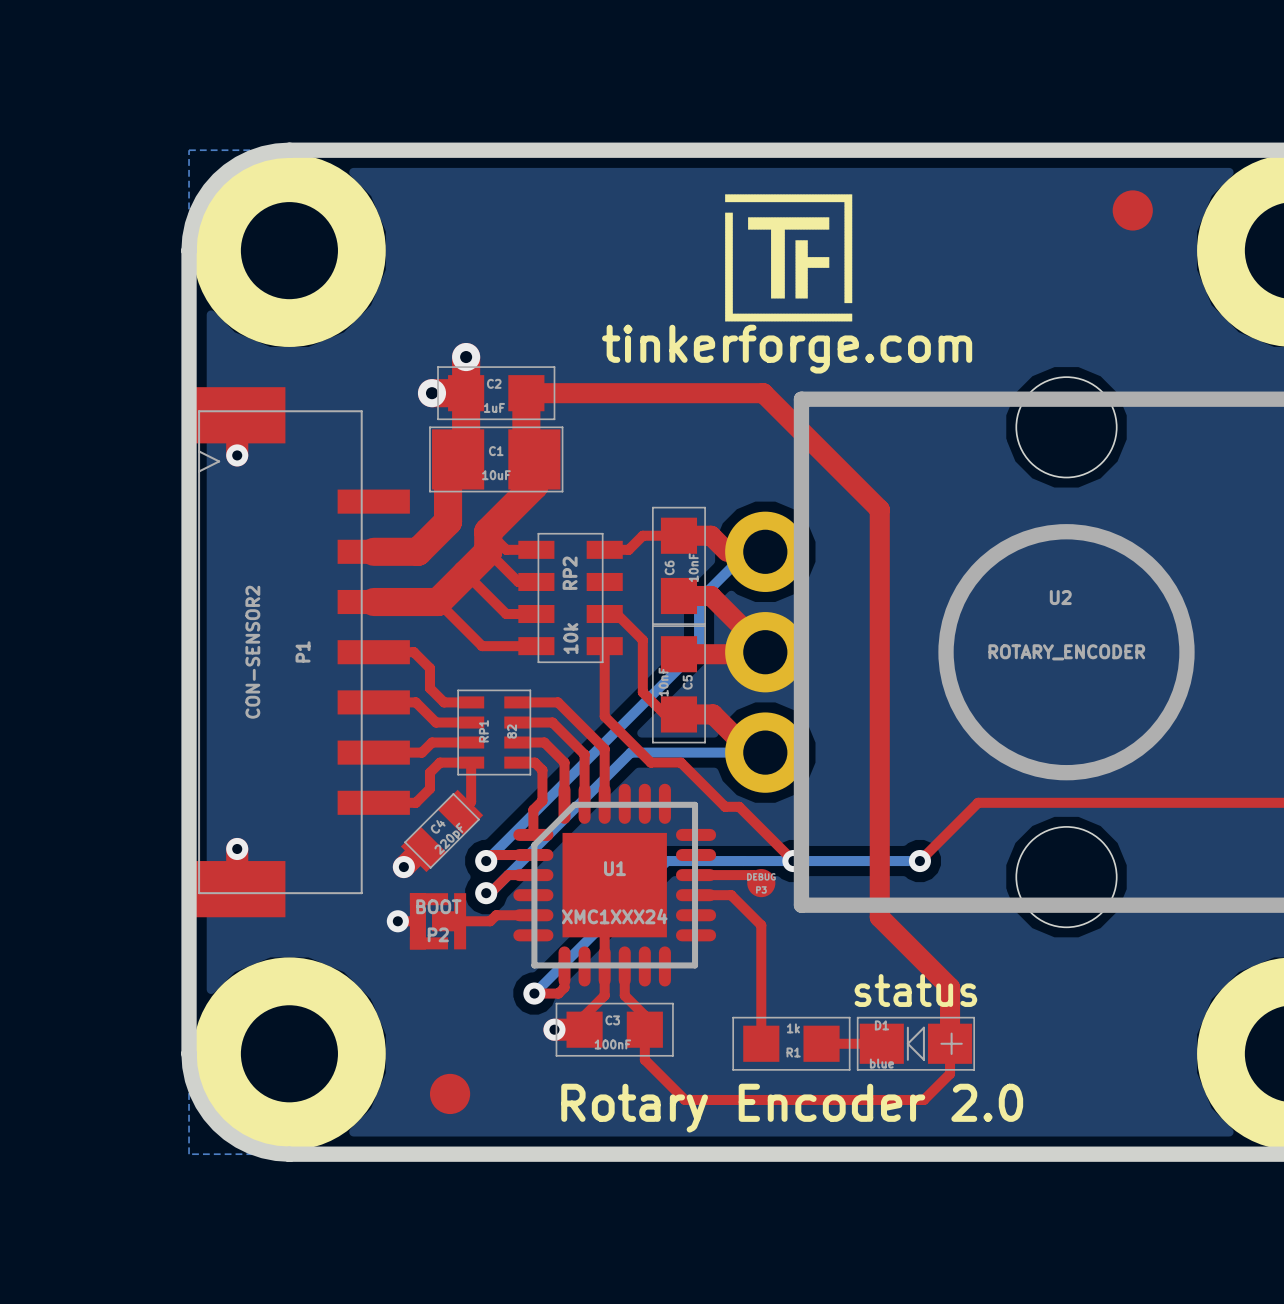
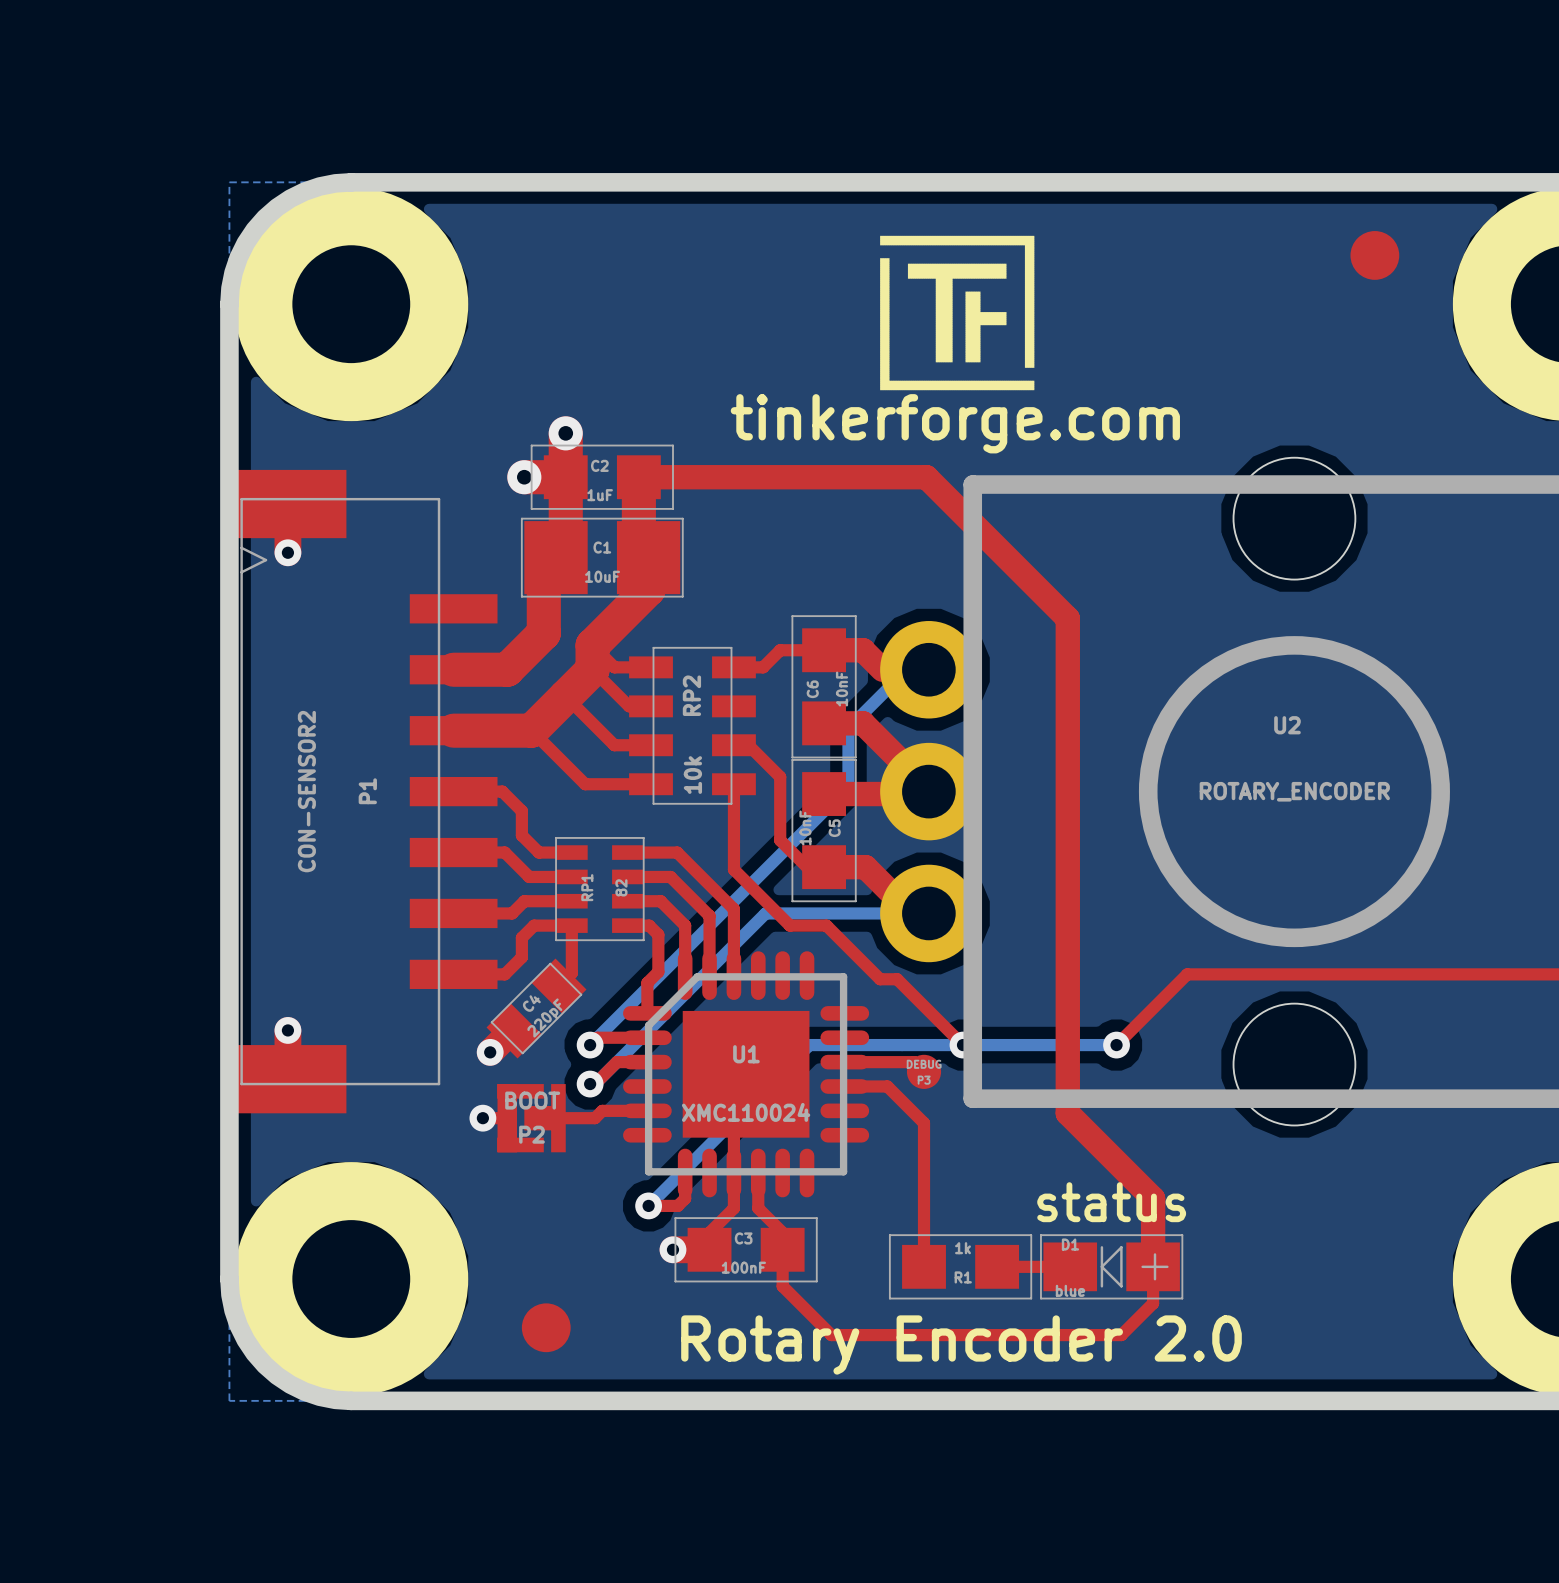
U1 value: XMC1XXX24 (614, 916) -> XMC110024 (746, 1112)

